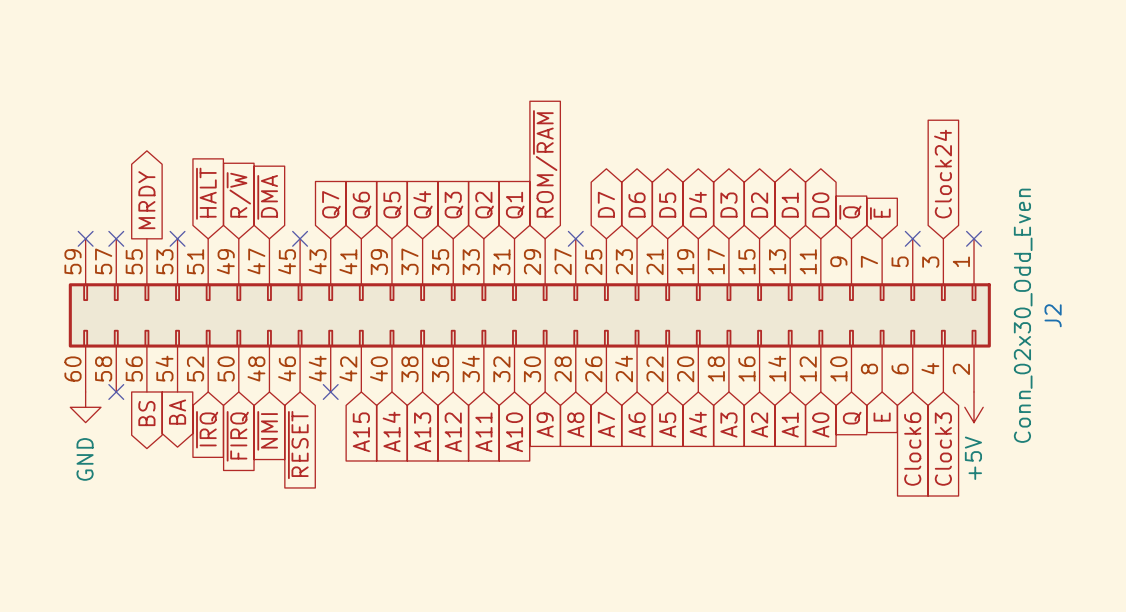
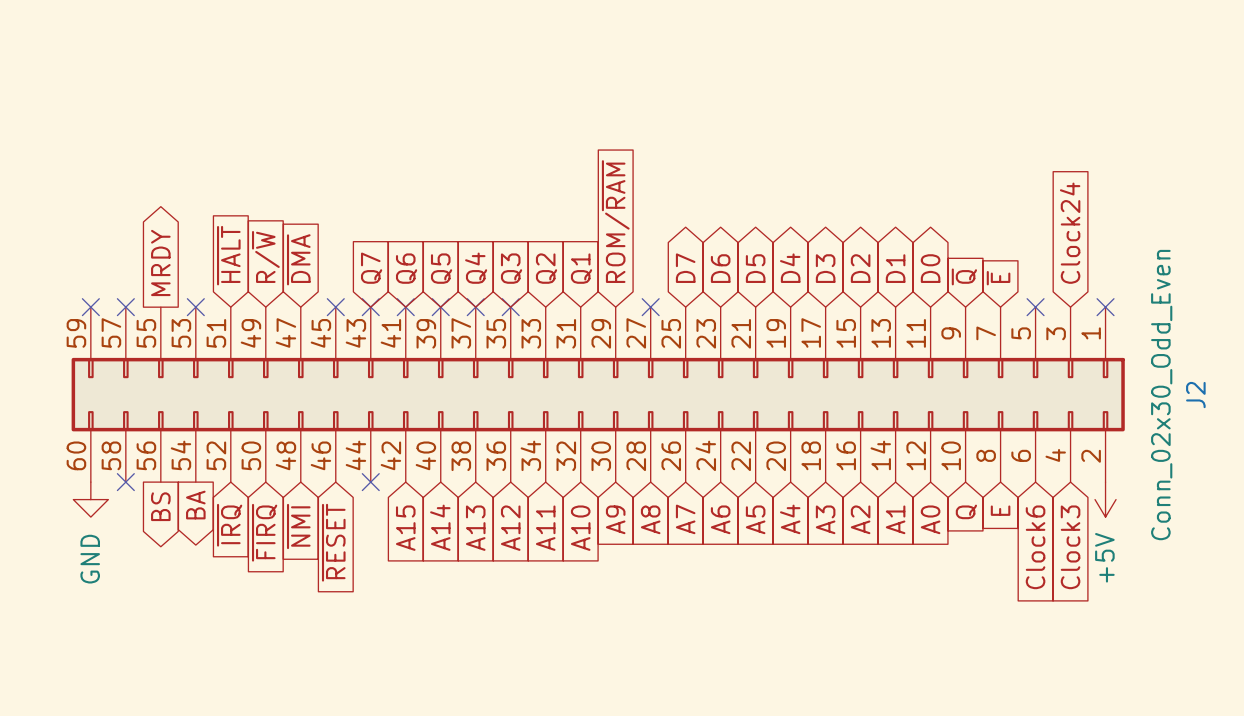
no-connect mark: none -> (370, 307)
no-connect mark: none -> (405, 307)
no-connect mark: none -> (440, 307)
no-connect mark: none -> (475, 307)
no-connect mark: none -> (510, 307)

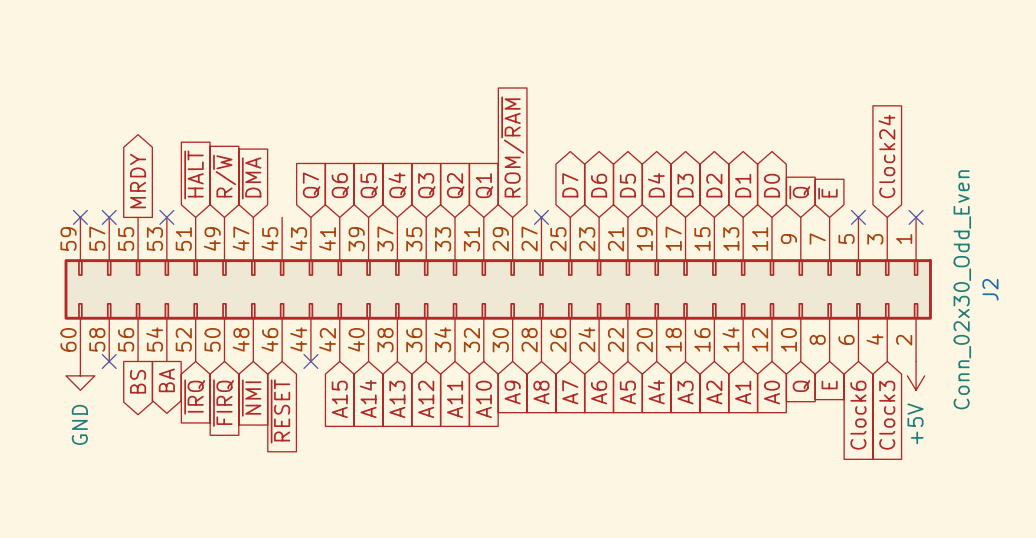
no-connect mark: (335, 307) -> none
no-connect mark: (370, 307) -> none
no-connect mark: (405, 307) -> none
no-connect mark: (440, 307) -> none
no-connect mark: (475, 307) -> none
no-connect mark: (510, 307) -> none

